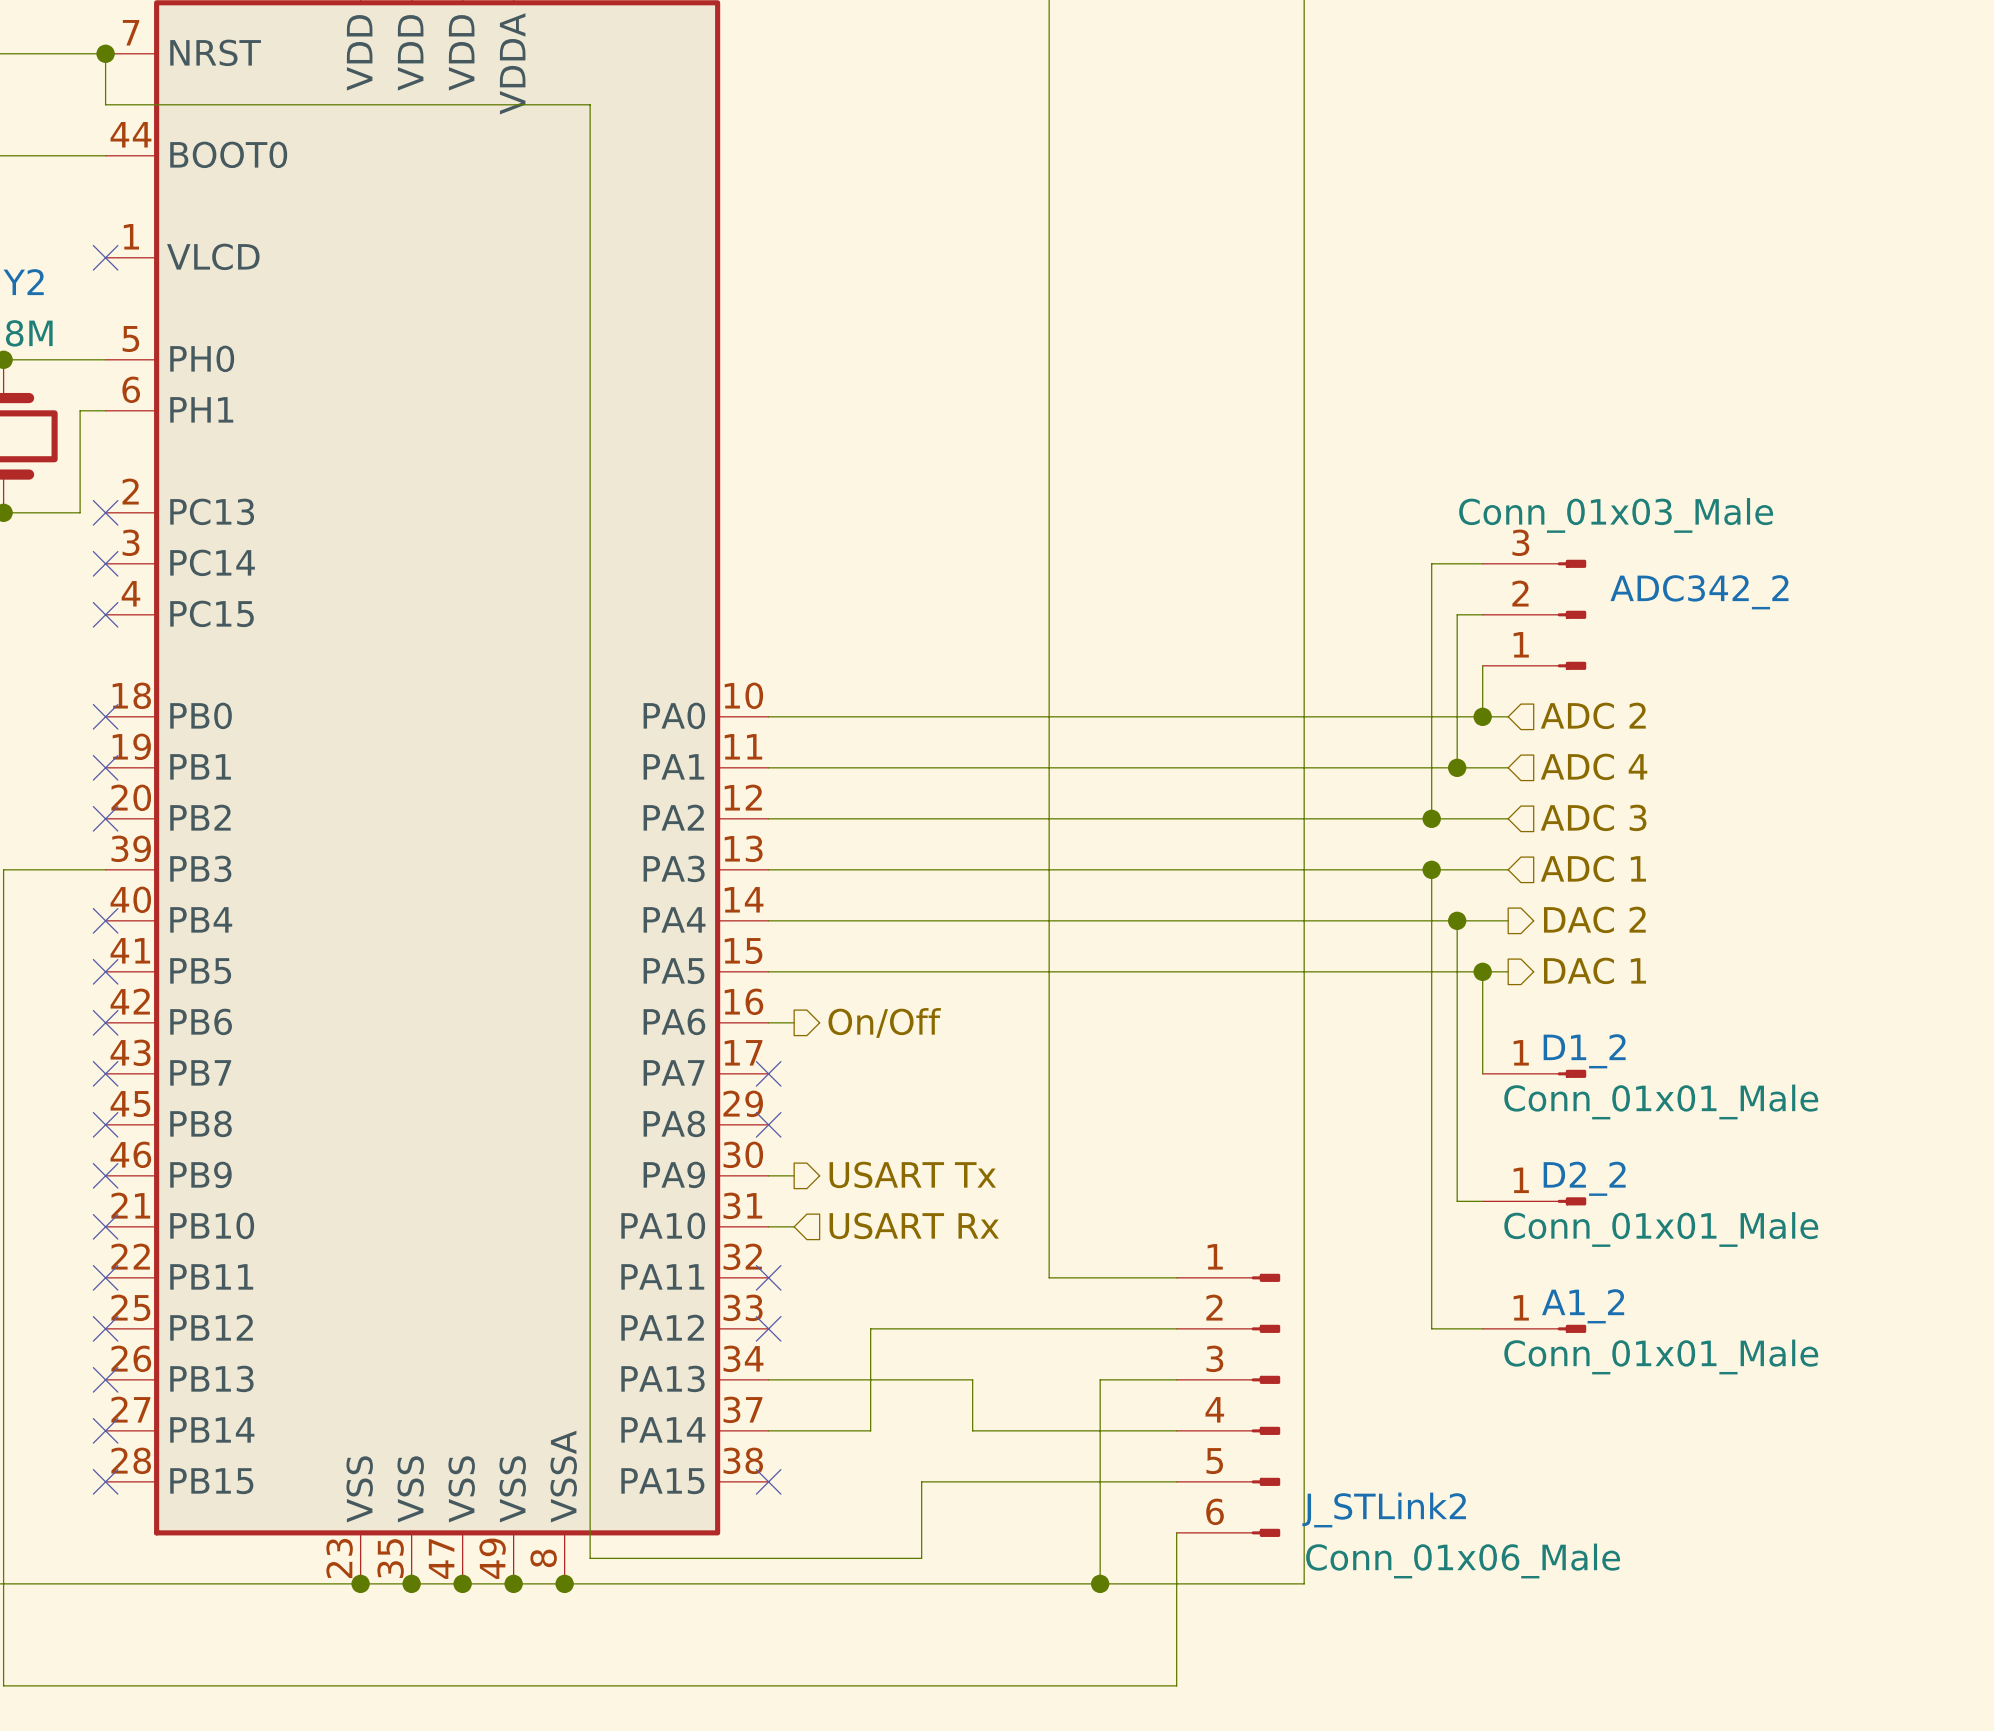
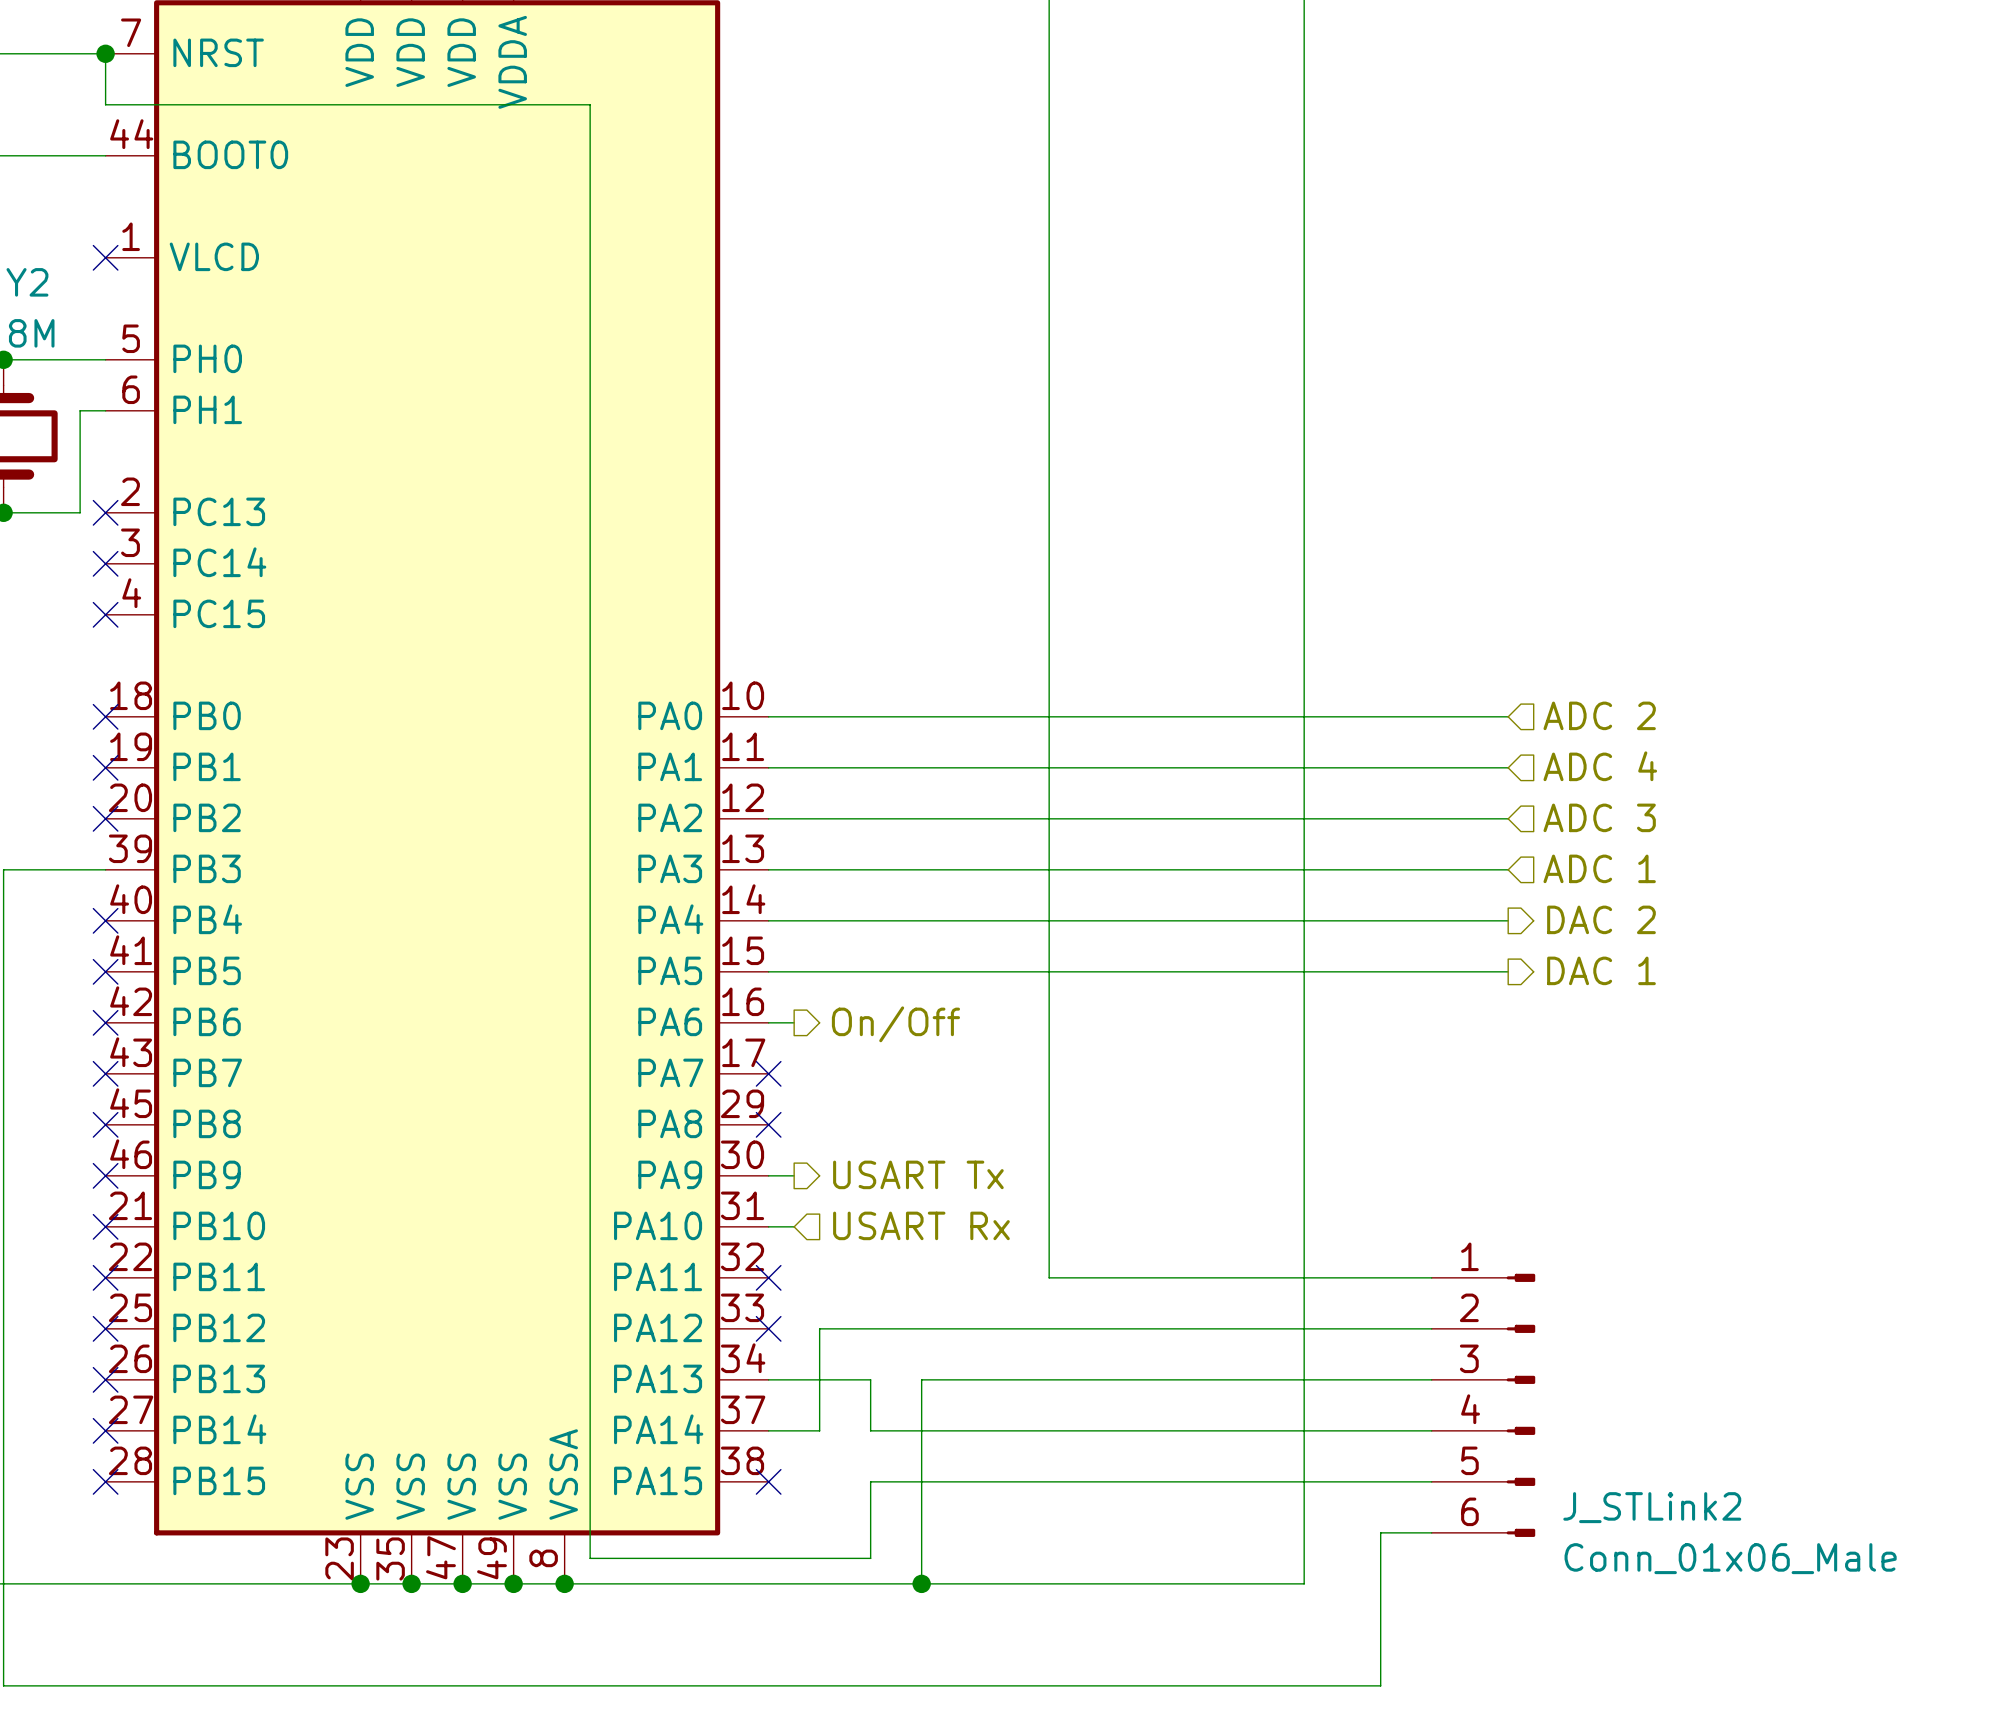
wire: (1482, 563) (1431, 563) (1431, 818) -> none
wire: (1482, 614) (1457, 614) (1457, 767) -> none
ADC342_2: Conn_01x03_Male (1534, 614) -> none
wire: (1482, 665) (1482, 716) -> none
junction: (1482, 716) -> none
junction: (1457, 767) -> none
junction: (1431, 818) -> none
wire: (1431, 869) (1431, 1328) (1482, 1328) -> none
junction: (1431, 869) -> none
wire: (1457, 920) (1457, 1201) (1482, 1201) -> none
junction: (1457, 920) -> none
wire: (1482, 971) (1482, 1073) -> none
junction: (1482, 971) -> none
D1_2: Conn_01x01_Male (1534, 1073) -> none
D2_2: Conn_01x01_Male (1534, 1201) -> none
wire: none -> (1176, 1277) (1431, 1277)
wire: (870, 1328) (870, 1379) (921, 1379) -> (870, 1558) (870, 1481) (921, 1481) (921, 1379)
wire: none -> (1176, 1328) (1431, 1328)
A1_2: Conn_01x01_Male (1534, 1328) -> none
wire: (972, 1379) (972, 1430) -> (870, 1430) (972, 1430)
wire: (1100, 1379) (1100, 1583) -> (1100, 1379) (972, 1379)
wire: none -> (1176, 1379) (1431, 1379)
J_STLink2 position: (1228, 1405) -> (1483, 1405)
wire: (819, 1430) (870, 1430) -> (819, 1430) (819, 1328) (870, 1328)
wire: none -> (1176, 1430) (1431, 1430)
wire: none -> (1176, 1481) (1431, 1481)
wire: (1176, 1532) (1176, 1685) -> (1431, 1532) (1380, 1532) (1380, 1685) (1176, 1685)
wire: (870, 1558) (921, 1558) -> (921, 1583) (921, 1558)
junction: none -> (921, 1583)
junction: (1100, 1583) -> none

